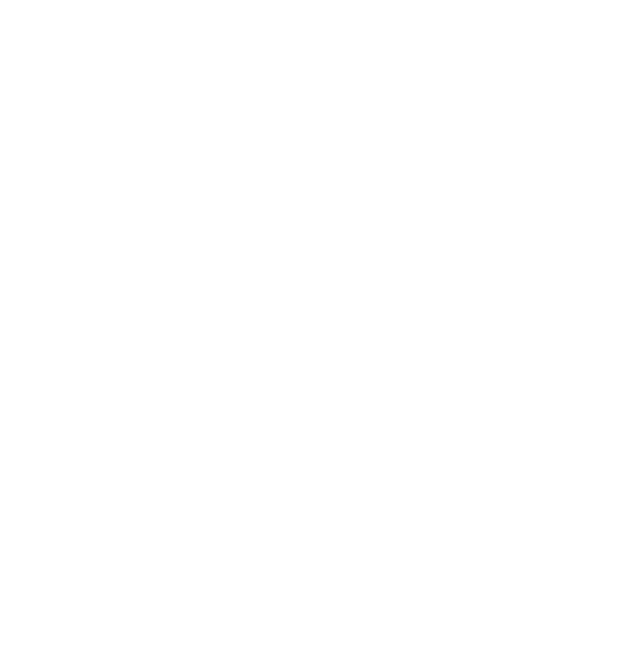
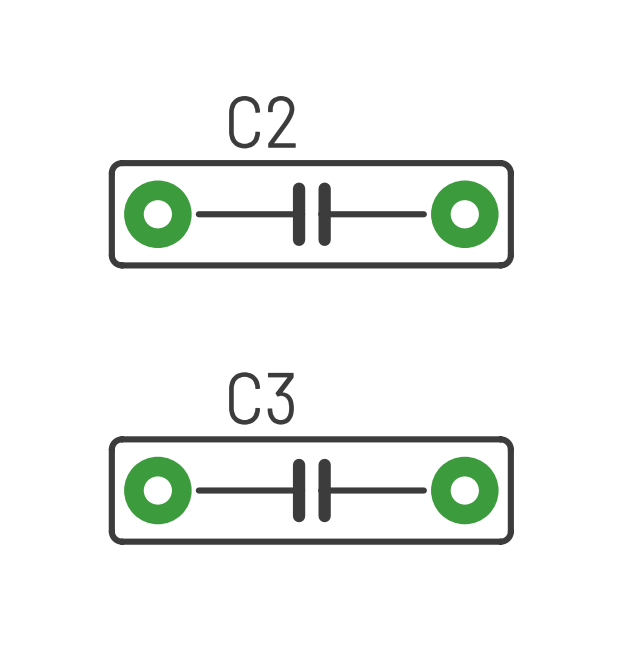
C2: none -> (311, 214)
C3: none -> (311, 490)

